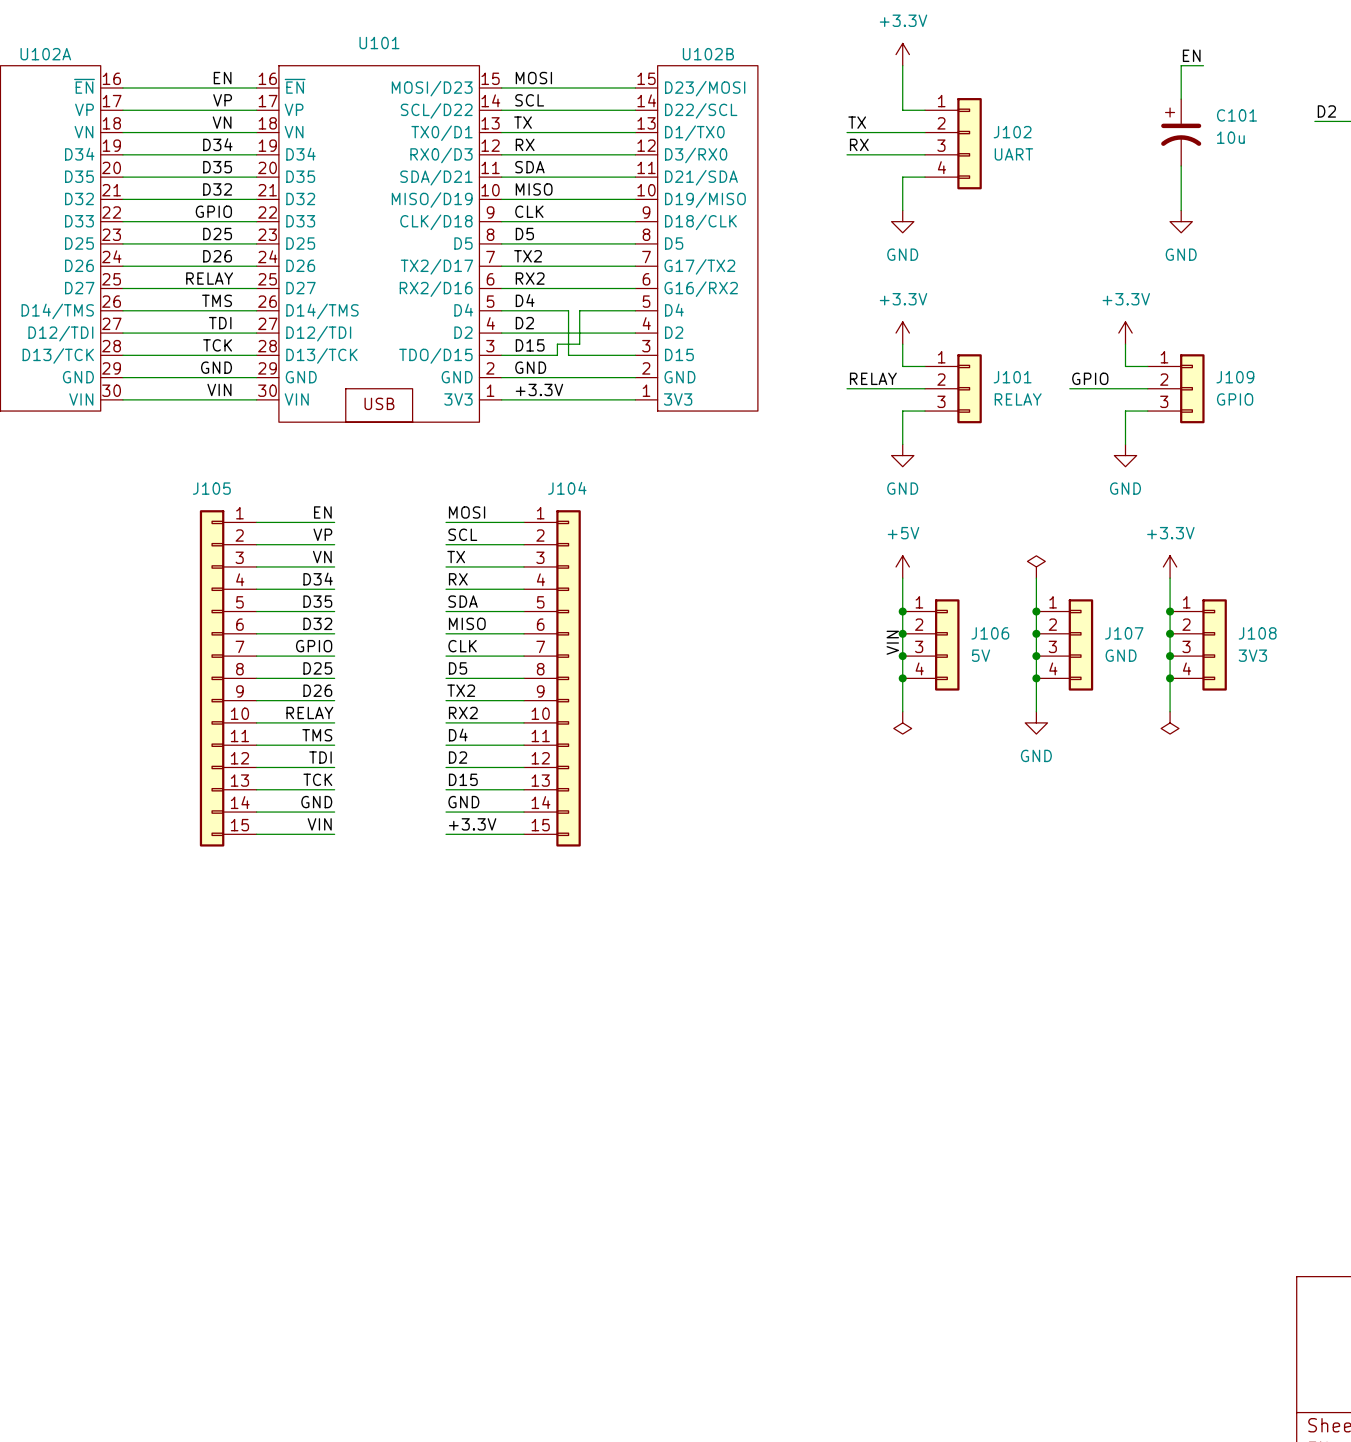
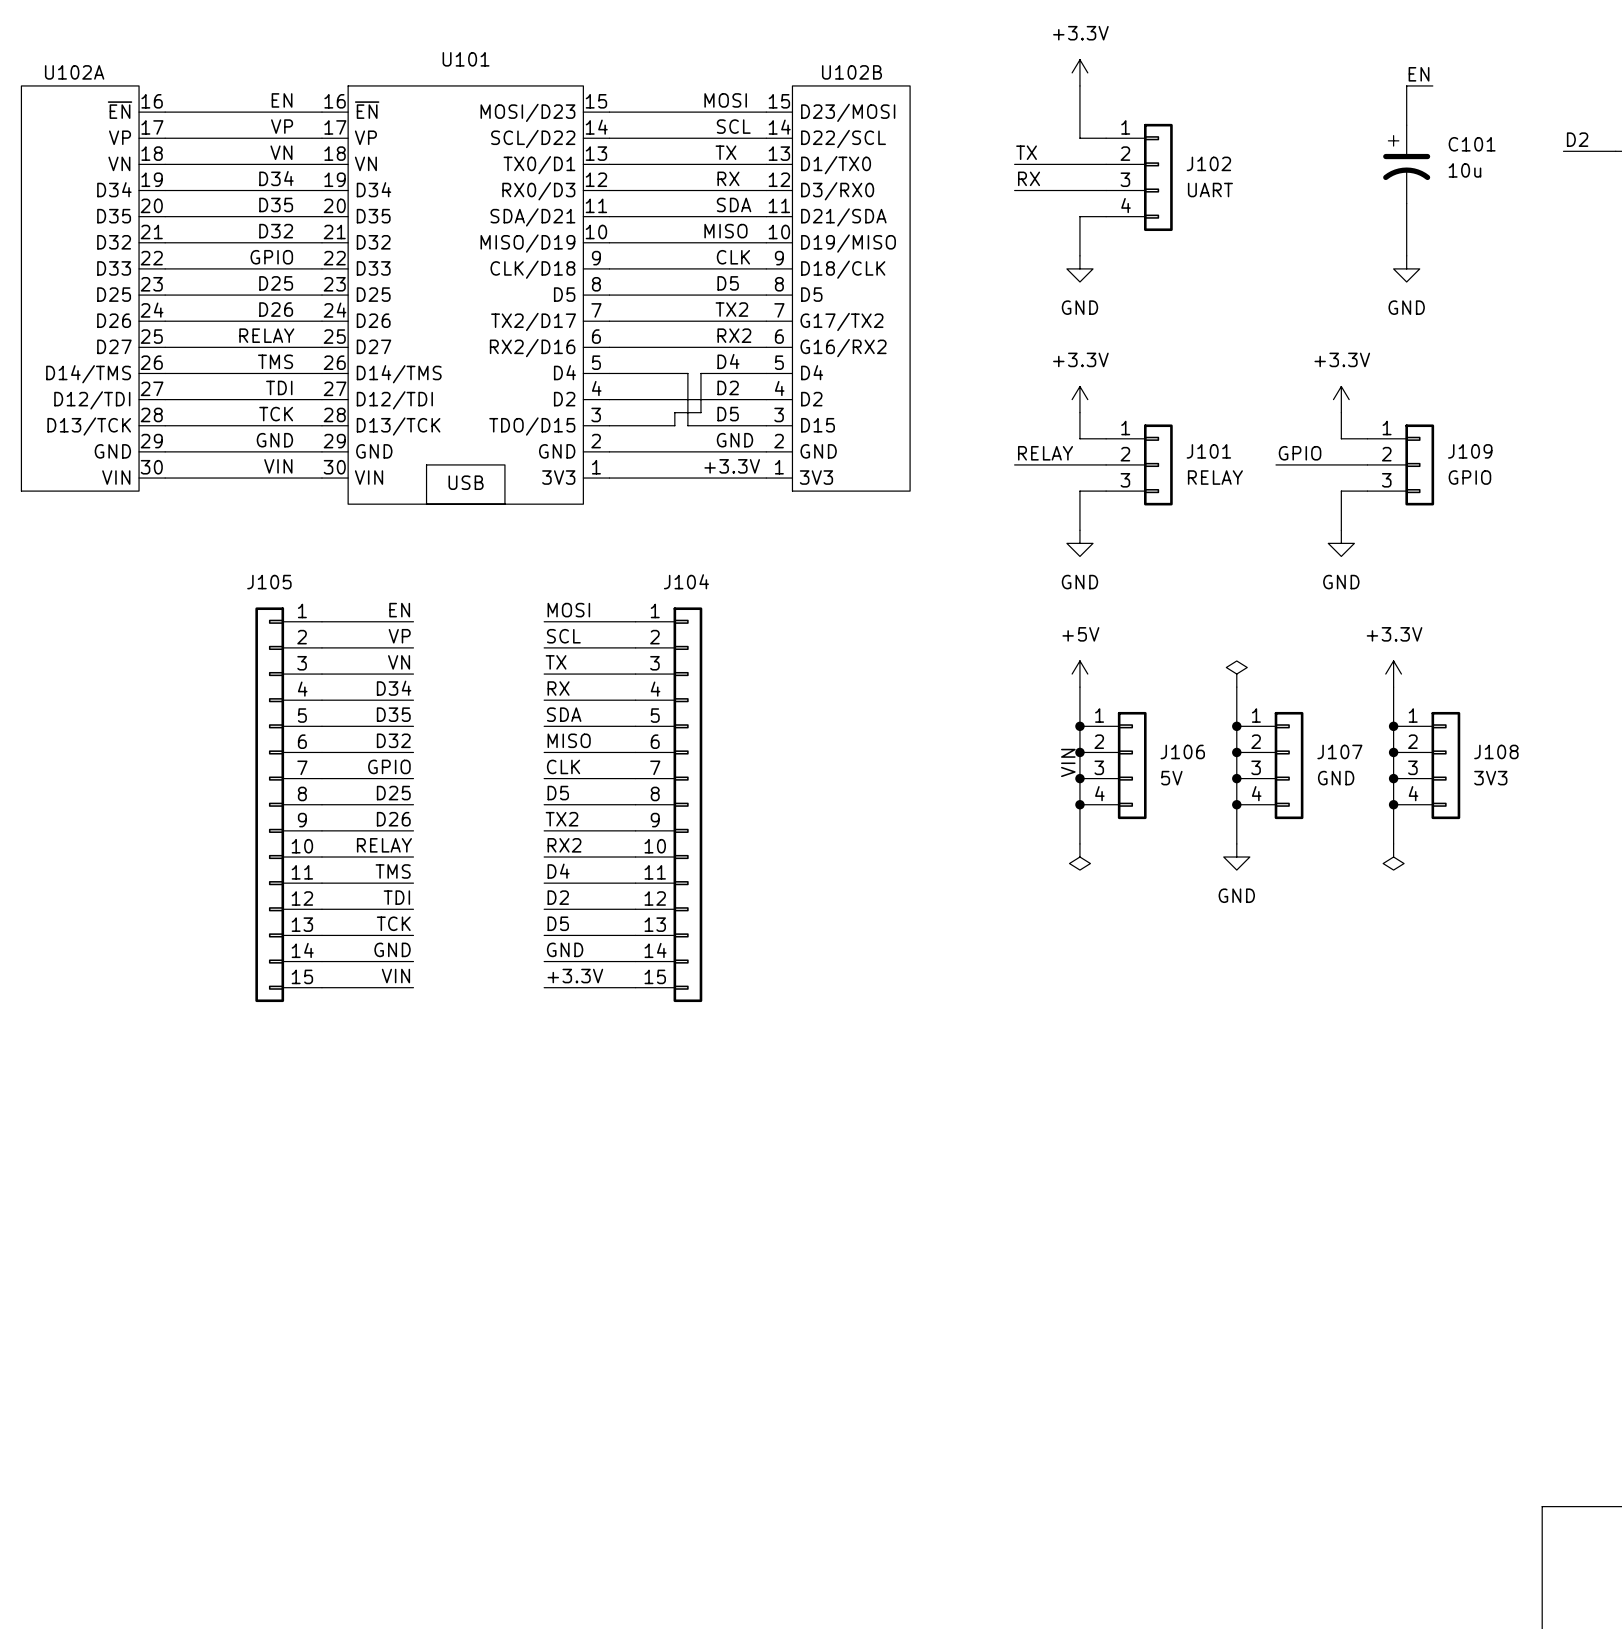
label position: MOSI (533, 78) -> MOSI (725, 100)
label position: SCL (529, 100) -> SCL (733, 126)
label position: TX (523, 122) -> TX (725, 152)
label position: RX (525, 144) -> RX (728, 178)
label position: SDA (529, 167) -> SDA (734, 204)
label position: MISO (534, 189) -> MISO (725, 231)
label position: CLK (529, 211) -> CLK (733, 257)
label: D5 (524, 234) -> none
label: none -> D5 (728, 283)
label position: TX2 (528, 256) -> TX2 (731, 309)
label position: RX2 (530, 278) -> RX2 (734, 335)
label position: D4 (525, 300) -> D4 (728, 361)
label position: D2 (524, 323) -> D2 (728, 387)
label: D15 (530, 345) -> none
label: none -> D5 (728, 414)
label position: GND (530, 367) -> GND (734, 440)
label position: +3.3V (539, 389) -> +3.3V (732, 466)
label: D15 (463, 779) -> D5 (558, 923)

